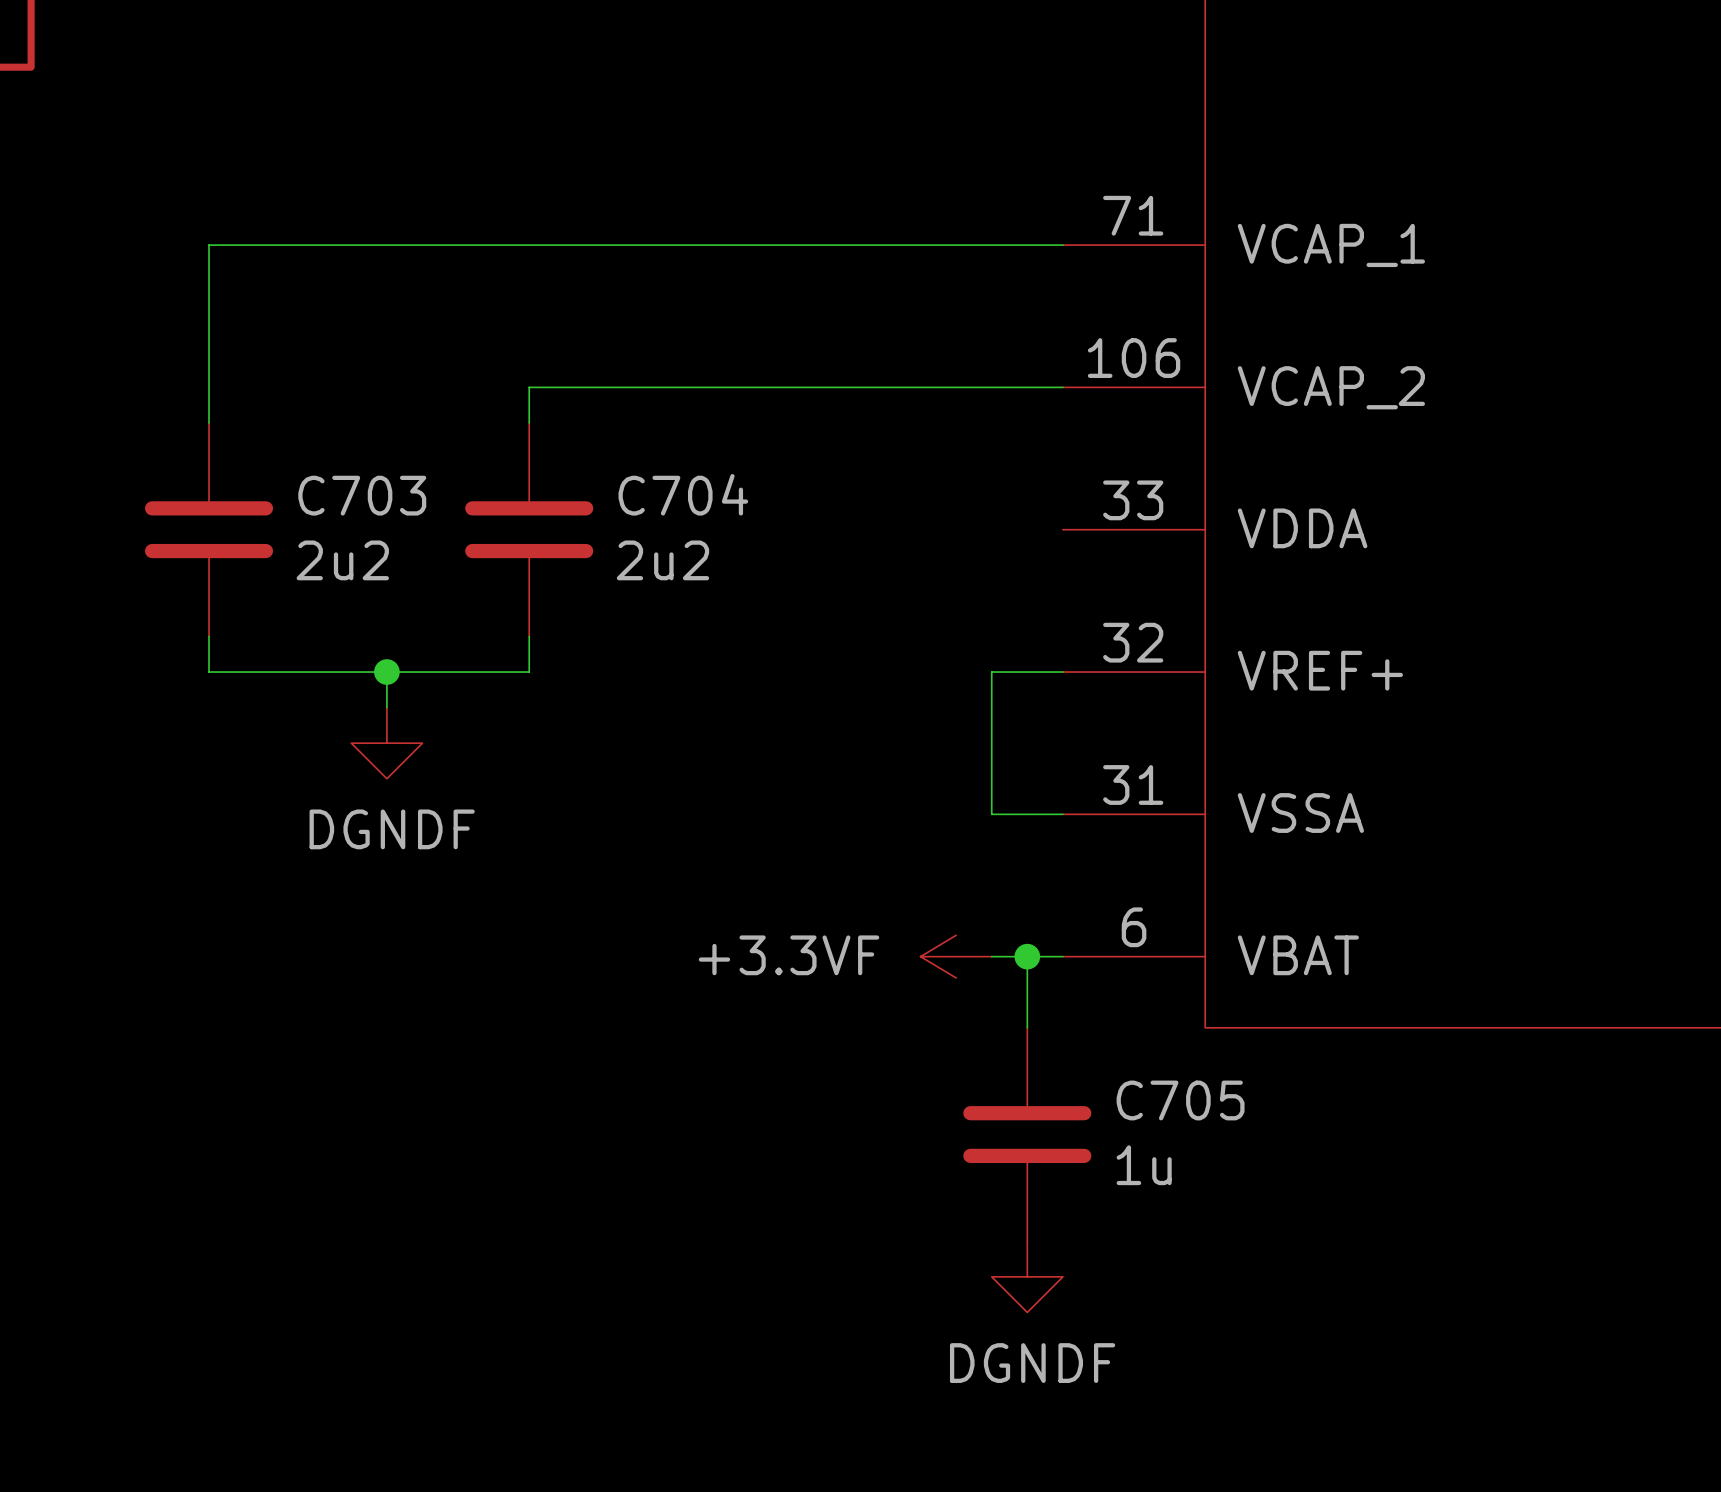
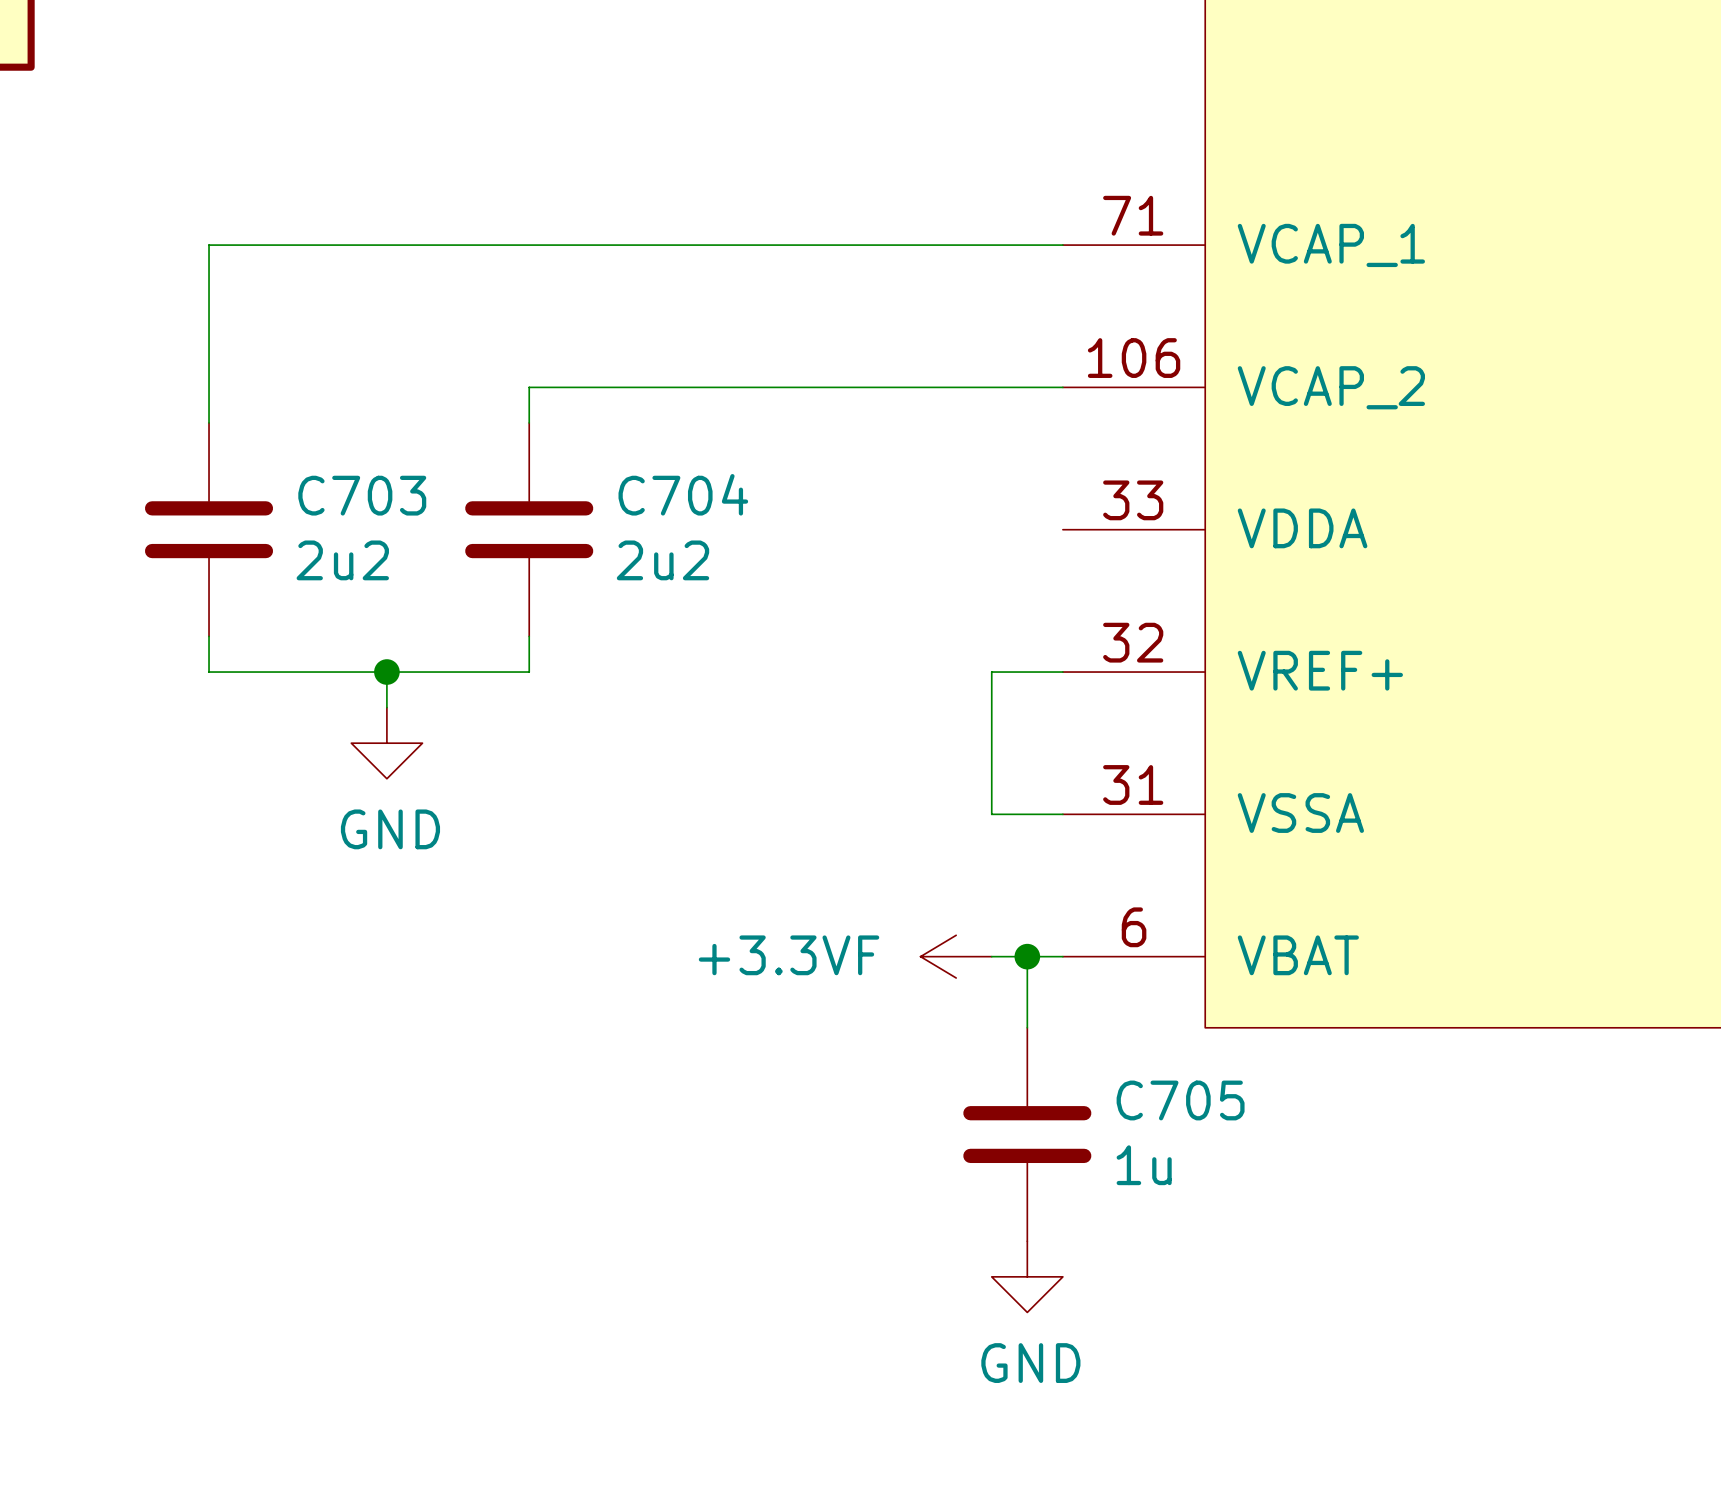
power symbol: DGNDF (386, 743) -> GND (386, 743)
power symbol: DGNDF (1027, 1276) -> GND (1027, 1276)

